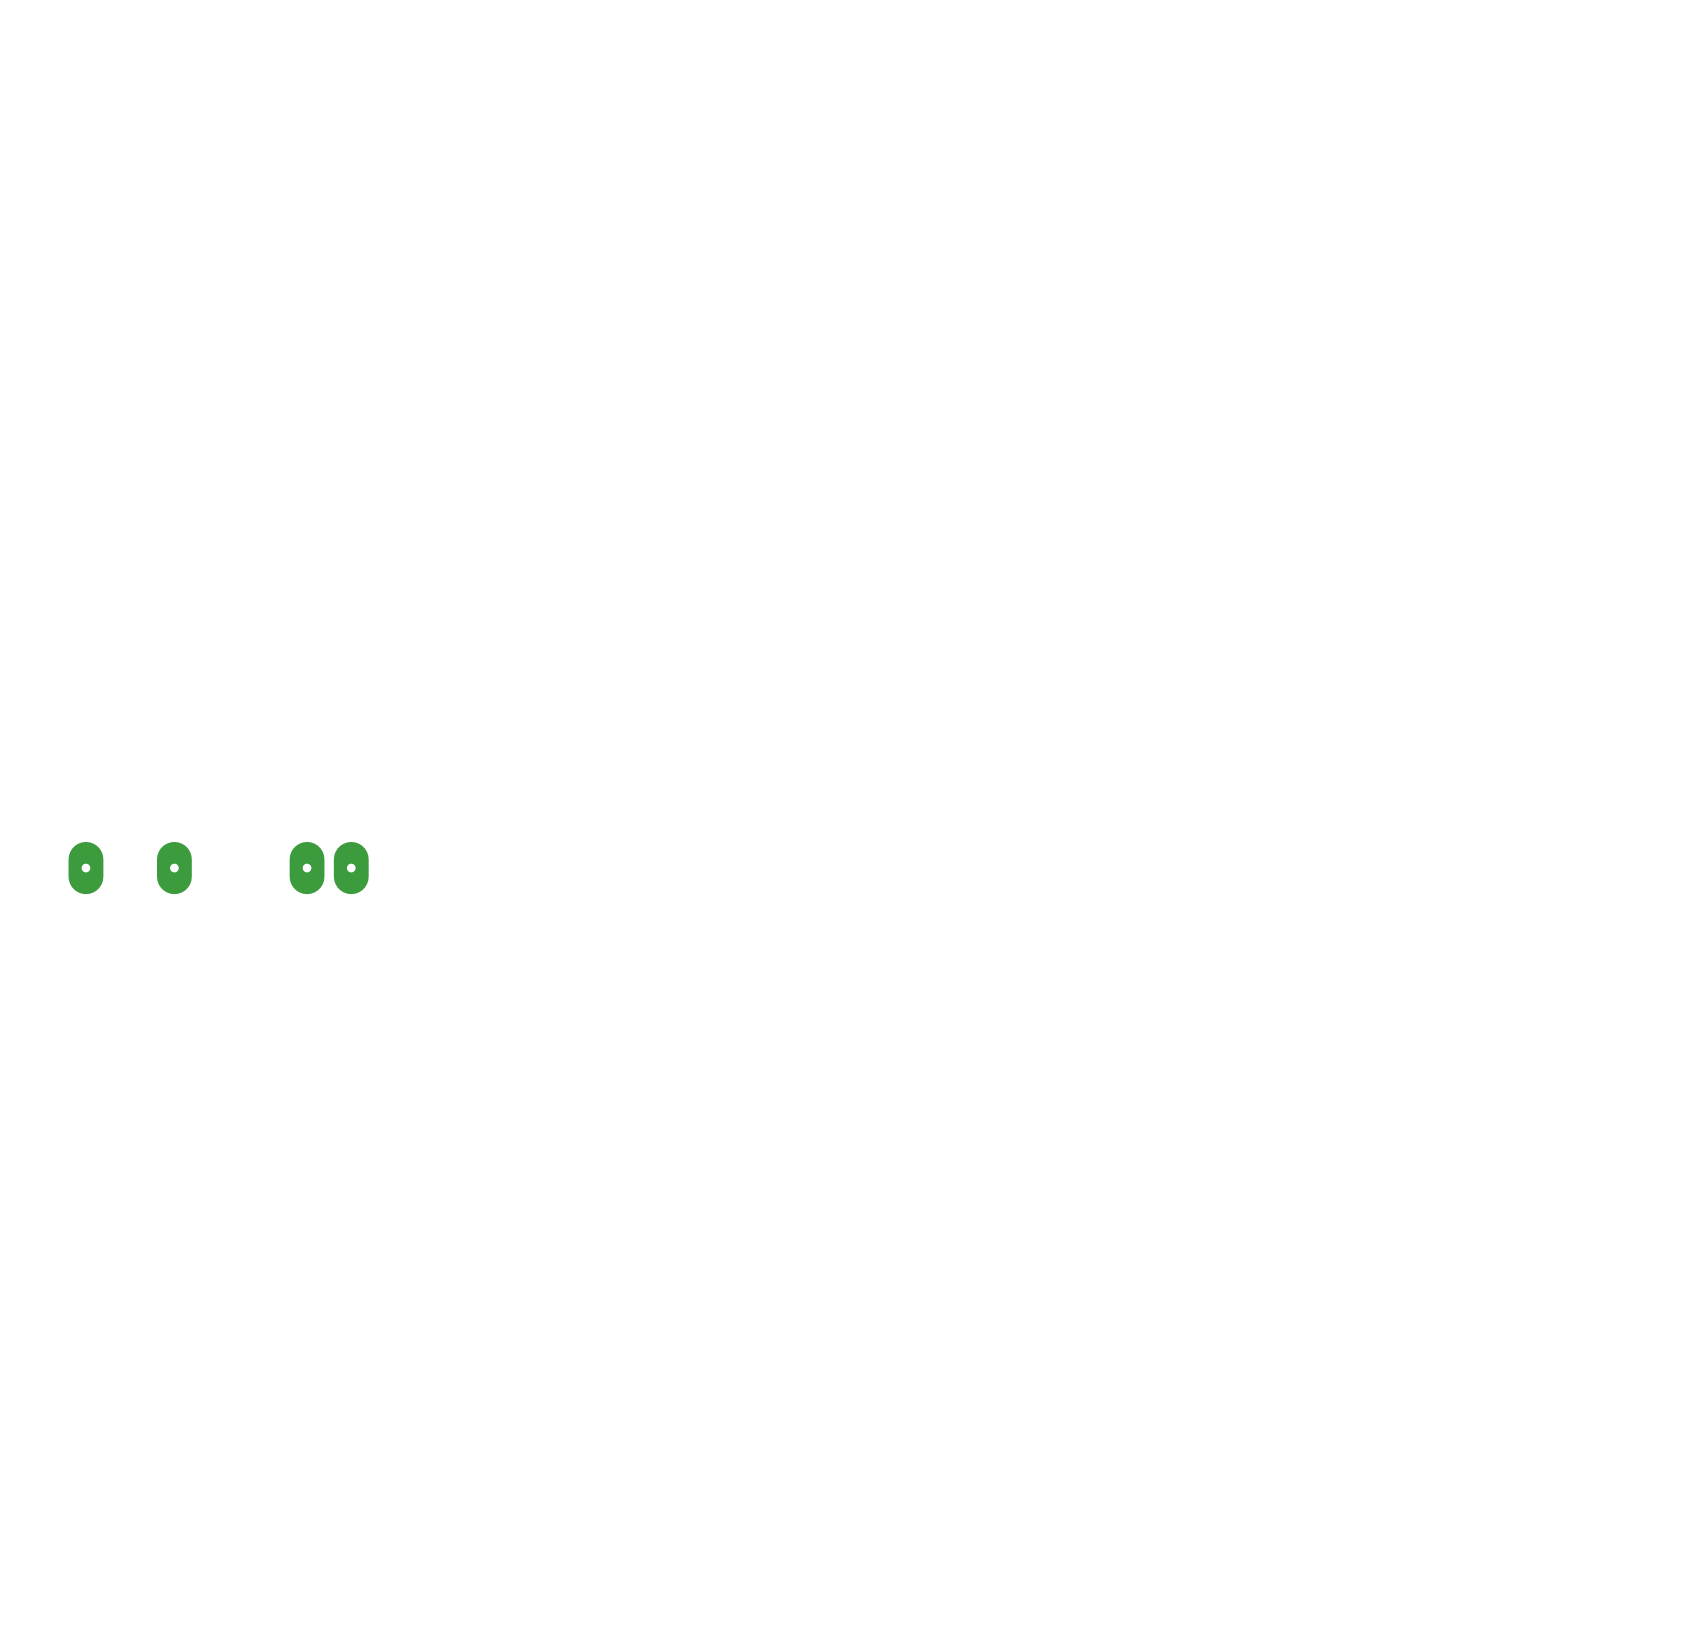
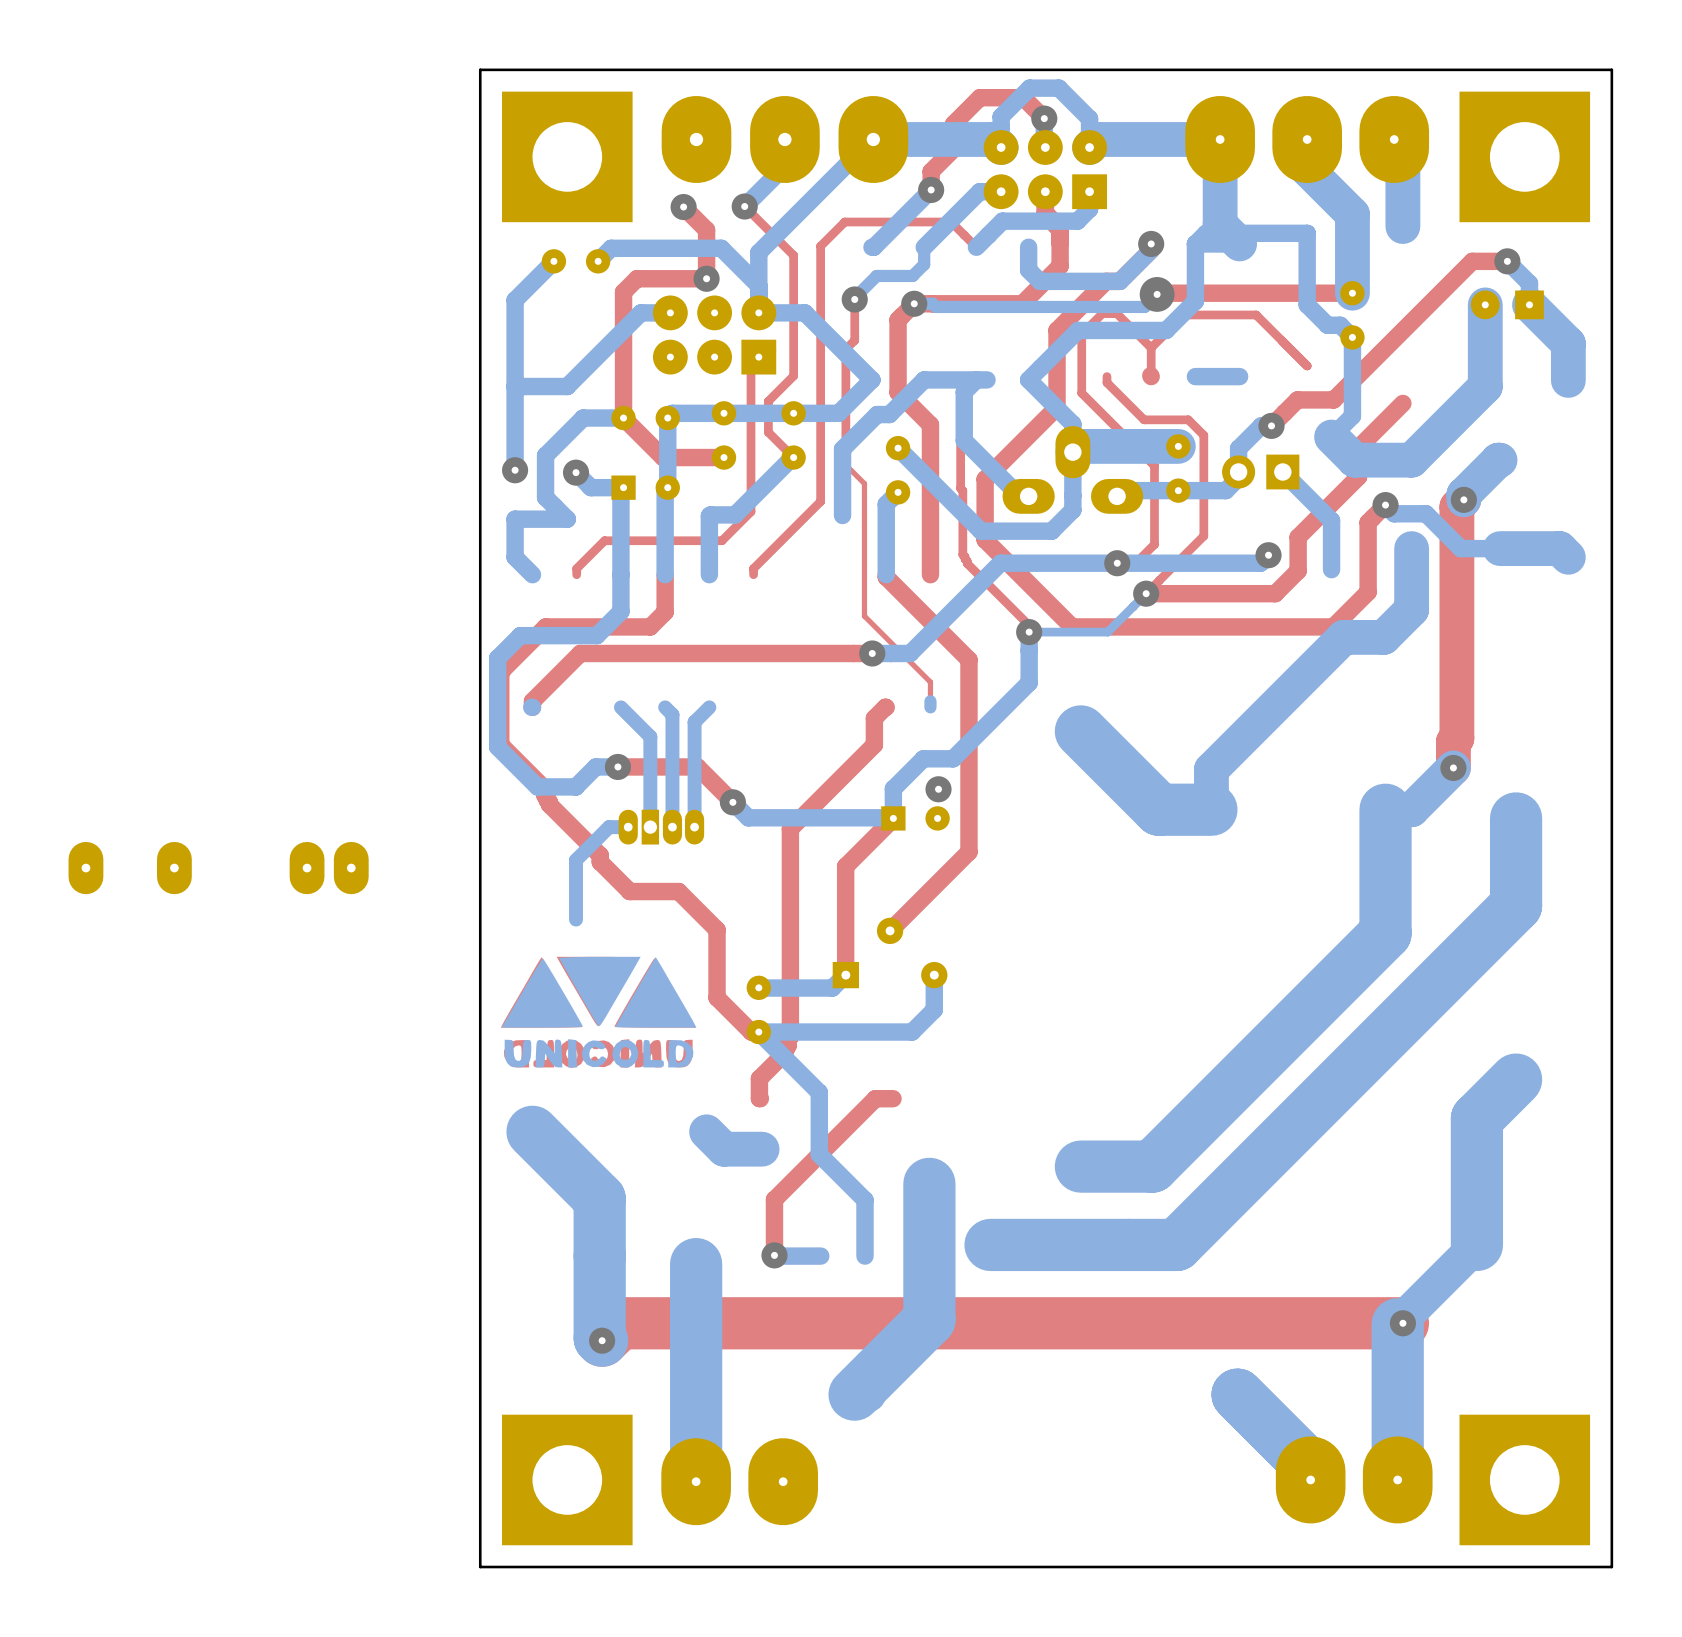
board edge: none -> (1611, 69) (1611, 1567) (480, 1567) (480, 69) (1611, 69)
top track: none -> (1044, 118) (1023, 97) (979, 97) (953, 123) (953, 148) (931, 171) (931, 189)
via: none -> (1044, 118)
part: none -> (784, 139)
part: none -> (1307, 139)
bottom track: none -> (1394, 139) (1402, 148) (1402, 226)
part: none -> (567, 156)
part: none -> (1524, 156)
bottom track: none -> (1307, 160) (1307, 139) (1307, 169) (1352, 214) (1352, 293)
bottom track: none -> (784, 166) (744, 206)
part: none -> (1045, 169)
bottom track: none -> (931, 189) (871, 247)
via: none -> (931, 189)
bottom track: none -> (1001, 191) (979, 191) (924, 247) (924, 264) (912, 275) (876, 275) (854, 299)
bottom track: none -> (1089, 191) (1089, 209) (1077, 221) (1002, 221) (976, 247)
top track: none -> (744, 206) (793, 255) (793, 376) (768, 401) (768, 432) (793, 457)
via: none -> (744, 206)
top track: none -> (683, 207) (706, 230) (706, 278) (636, 278) (623, 292) (623, 418) (663, 457) (723, 457)
via: none -> (683, 207)
top track: none -> (1045, 212) (1060, 227) (1060, 266) (1022, 303) (914, 303) (898, 319) (898, 392) (930, 424) (930, 574)
top track: none -> (1151, 243) (1151, 250) (1119, 281) (1106, 281) (1057, 330) (1057, 407) (985, 479) (985, 539) (1072, 626) (1333, 626) (1368, 592) (1368, 522) (1385, 505)
bottom track: none -> (1151, 243) (1151, 250) (1119, 281) (1039, 281) (1028, 270) (1028, 247)
via: none -> (1151, 243)
bottom track: none -> (1195, 243) (1195, 301) (1166, 330) (1078, 330) (1028, 379) (1072, 424) (1072, 510) (1051, 531) (981, 531) (898, 448)
bottom track: none -> (1195, 243) (1206, 233) (1307, 233) (1307, 304) (1327, 325) (1340, 325) (1352, 337) (1352, 416) (1331, 437) (1354, 460) (1411, 460) (1485, 386) (1485, 304)
bottom track: none -> (1195, 243) (1239, 243) (1220, 224) (1220, 139) (1097, 139) (1089, 147) (1089, 118) (1058, 88) (1029, 88) (1001, 116) (1001, 147) (993, 139) (871, 139) (758, 252) (758, 312) (804, 312) (871, 379) (838, 413) (672, 413) (667, 418) (665, 574)
top track: none -> (976, 247) (951, 222) (844, 222) (820, 246) (820, 501) (753, 568) (753, 574)
bottom track: none -> (553, 261) (515, 300) (515, 470)
part: none -> (576, 261)
bottom track: none -> (598, 261) (611, 248) (721, 248) (758, 285)
top track: none -> (1507, 261) (1472, 261) (1333, 399) (1297, 399) (1271, 425)
bottom track: none -> (1507, 261) (1529, 283) (1529, 304) (1568, 343) (1568, 380)
via: none -> (1507, 261)
via: none -> (706, 278)
top track: none -> (1352, 293) (1157, 294)
bottom track: none -> (1157, 294) (1144, 306) (935, 306) (932, 303) (914, 303)
via: none -> (1157, 294)
top track: none -> (854, 299) (854, 340) (845, 349) (845, 465) (864, 483) (864, 616) (930, 682) (930, 707)
via: none -> (854, 299)
via: none -> (914, 303)
part: none -> (1507, 304)
bottom track: none -> (670, 312) (640, 312) (567, 386) (515, 386)
part: none -> (1352, 315)
part: none -> (714, 334)
top track: none -> (1151, 347) (1184, 314) (1256, 314) (1307, 365)
top track: none -> (1151, 347) (1150, 375)
top track: none -> (1151, 347) (1116, 313) (1102, 313) (1081, 334) (1081, 393) (1154, 465) (1154, 544) (1135, 563) (1117, 563)
top track: none -> (767, 350) (751, 366) (751, 511) (721, 540) (604, 540) (576, 568) (576, 574)
top track: none -> (1106, 376) (1106, 382) (1144, 419) (1188, 419) (1203, 435) (1203, 536) (1146, 593) (1275, 593) (1298, 570) (1298, 537) (1358, 476) (1358, 447) (1402, 403)
bottom track: none -> (1239, 376) (1195, 376)
bottom track: none -> (976, 379) (964, 392) (964, 440) (1019, 496) (1028, 496)
bottom track: none -> (987, 379) (924, 379) (889, 414) (877, 414) (842, 449) (842, 515)
top track: none -> (976, 380) (960, 395) (962, 554) (967, 563) (1029, 625) (1029, 632)
bottom track: none -> (623, 418) (583, 418) (545, 455) (545, 497) (567, 519) (515, 519) (515, 557) (532, 574)
part: none -> (645, 418)
bottom track: none -> (1271, 425) (1261, 425) (1238, 448) (1238, 477) (1225, 490) (1122, 490) (1117, 496)
via: none -> (1271, 425)
part: none -> (723, 435)
part: none -> (793, 435)
bottom track: none -> (1178, 446) (1078, 446) (1072, 452)
bottom track: none -> (793, 457) (735, 514) (709, 516) (709, 574)
bottom track: none -> (1500, 460) (1463, 494) (1463, 499)
part: none -> (1178, 468)
part: none -> (1072, 469)
via: none -> (515, 470)
part: none -> (898, 470)
bottom track: none -> (576, 472) (591, 487) (623, 487) (620, 490) (620, 611) (596, 635) (520, 635) (497, 658) (497, 747) (537, 786) (576, 786) (595, 766) (617, 766)
via: none -> (576, 472)
part: none -> (1260, 472)
bottom track: none -> (1282, 472) (1331, 520) (1331, 569)
part: none -> (645, 487)
bottom track: none -> (898, 492) (886, 504) (886, 574)
top track: none -> (1463, 499) (1456, 506) (1456, 738) (1453, 741) (1453, 767)
via: none -> (1463, 499)
bottom track: none -> (1385, 505) (1394, 513) (1426, 513) (1460, 548) (1559, 548) (1568, 557)
via: none -> (1385, 505)
bottom track: none -> (1411, 548) (1411, 609) (1383, 637) (1343, 637) (1211, 769) (1211, 809) (1159, 809)
bottom track: none -> (1268, 555) (1260, 563) (1000, 563) (910, 653) (872, 653)
via: none -> (1268, 555)
via: none -> (1117, 563)
top track: none -> (665, 574) (665, 612) (650, 626) (545, 626) (502, 669) (500, 669) (500, 744) (544, 789) (544, 795) (549, 804) (600, 855) (600, 862) (629, 891) (678, 891) (717, 929) (717, 997) (751, 1032) (759, 1032)
top track: none -> (886, 574) (886, 577) (968, 659) (968, 851) (890, 930)
bottom track: none -> (1146, 593) (1107, 632) (1029, 632) (1029, 682) (953, 758) (923, 758) (893, 788) (893, 818) (748, 817) (732, 802)
via: none -> (1146, 593)
via: none -> (1029, 632)
top track: none -> (872, 653) (580, 653) (532, 701) (532, 707)
via: none -> (872, 653)
bottom track: none -> (930, 701) (930, 707)
bottom track: none -> (531, 707) (532, 707)
bottom track: none -> (620, 707) (650, 736) (650, 827)
bottom track: none -> (665, 707) (672, 714) (672, 827)
bottom track: none -> (709, 707) (694, 722) (694, 827)
top track: none -> (886, 707) (874, 718) (874, 744) (790, 828) (790, 1036) (785, 1049) (759, 1078) (760, 1098)
top track: none -> (617, 766) (697, 766) (732, 802)
via: none -> (617, 766)
bottom track: none -> (1453, 767) (1411, 809) (1385, 809) (1385, 933) (1152, 1166) (1080, 1166)
via: none -> (1453, 767)
via: none -> (938, 789)
via: none -> (732, 802)
bottom track: none -> (1159, 809) (1080, 731) (1159, 809)
top track: none -> (893, 818) (845, 866) (845, 975)
part: none -> (915, 818)
bottom track: none -> (1516, 818) (1516, 905) (1176, 1244) (990, 1244)
bottom track: none -> (628, 827) (609, 827) (576, 860) (576, 919)
part: none -> (661, 827)
part: none -> (890, 953)
drawing: none -> [500, 956, 697, 1068]
bottom track: none -> (934, 974) (934, 1009) (912, 1032) (758, 1032)
bottom track: none -> (845, 975) (832, 988) (758, 987)
part: none -> (758, 1009)
bottom track: none -> (758, 1032) (819, 1092) (819, 1154) (865, 1200) (865, 1256)
top track: none -> (893, 1098) (875, 1098) (774, 1199) (774, 1255)
bottom track: none -> (1476, 1118) (1516, 1079) (1476, 1118)
bottom track: none -> (1476, 1118) (1476, 1244) (1397, 1324) (1397, 1479)
bottom track: none -> (532, 1131) (599, 1198) (599, 1338) (602, 1340)
bottom track: none -> (706, 1131) (723, 1149) (762, 1149)
via: none -> (774, 1255)
bottom track: none -> (820, 1255) (774, 1255)
bottom track: none -> (696, 1264) (696, 1481)
bottom track: none -> (929, 1319) (929, 1183) (929, 1319)
bottom track: none -> (929, 1319) (854, 1394) (868, 1394)
top track: none -> (1402, 1323) (619, 1323) (602, 1340)
via: none -> (1402, 1323)
via: none -> (602, 1340)
bottom track: none -> (1310, 1467) (1237, 1394) (1310, 1467)
part: none -> (567, 1479)
part: none -> (1354, 1479)
part: none -> (1524, 1479)
part: none -> (739, 1481)

